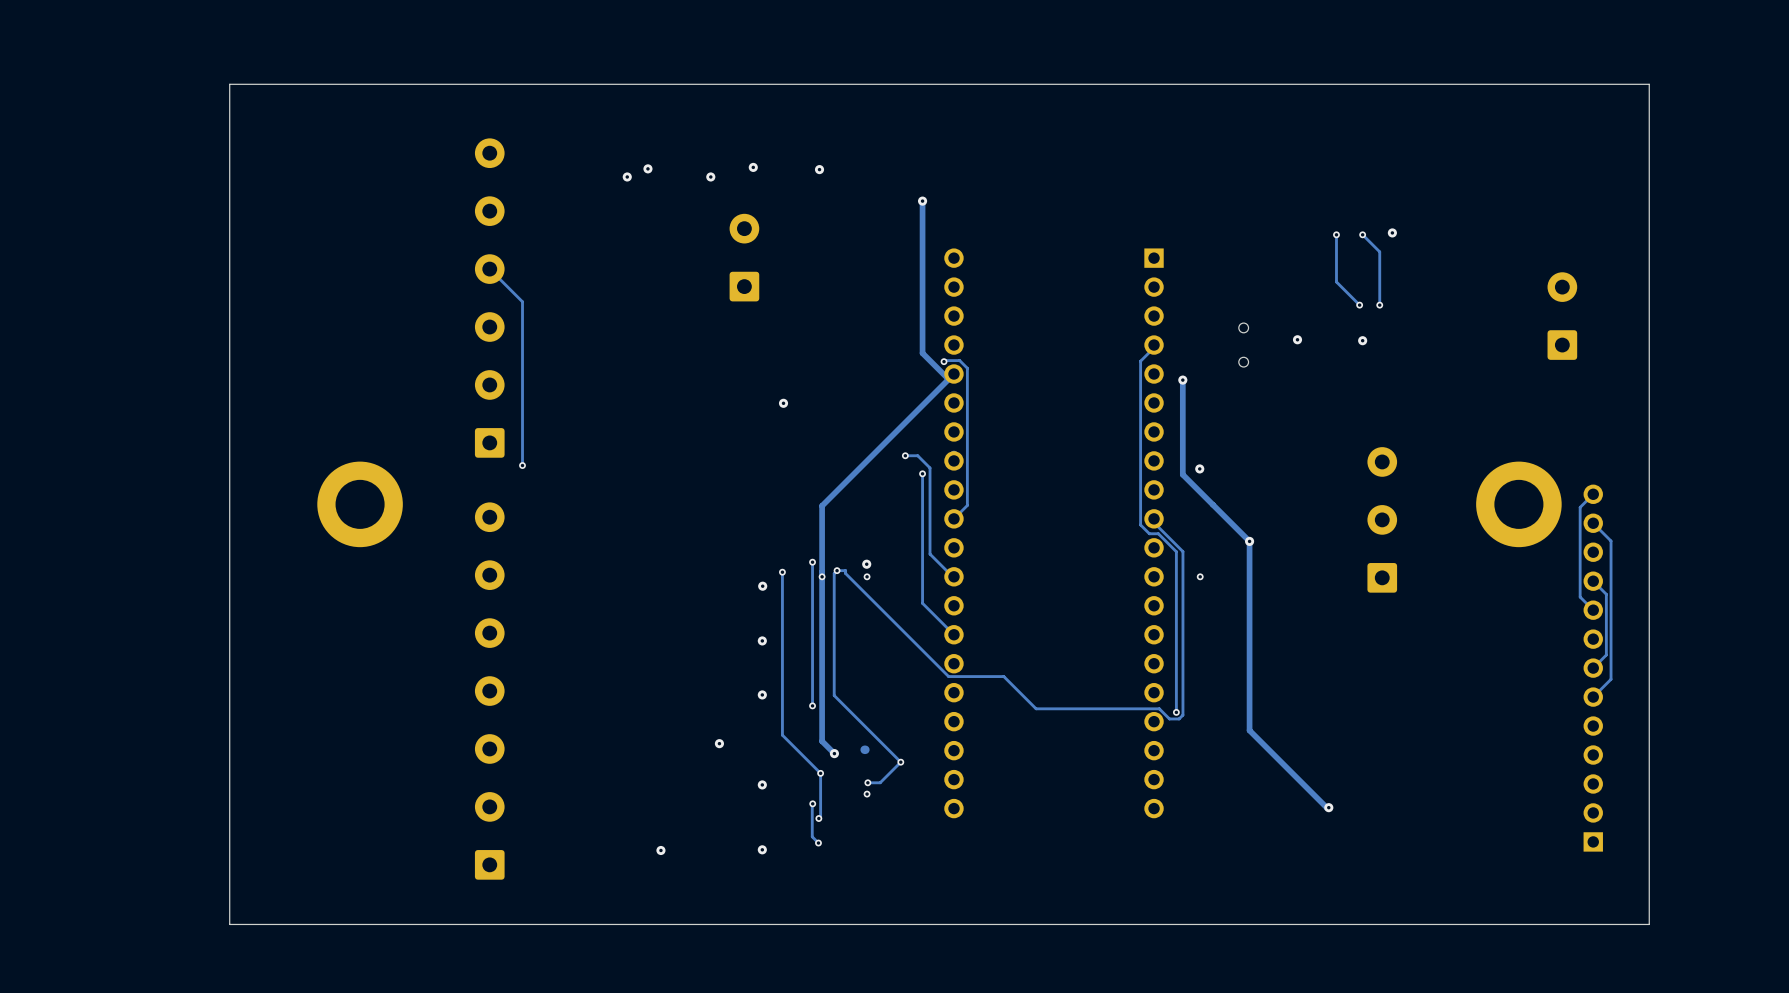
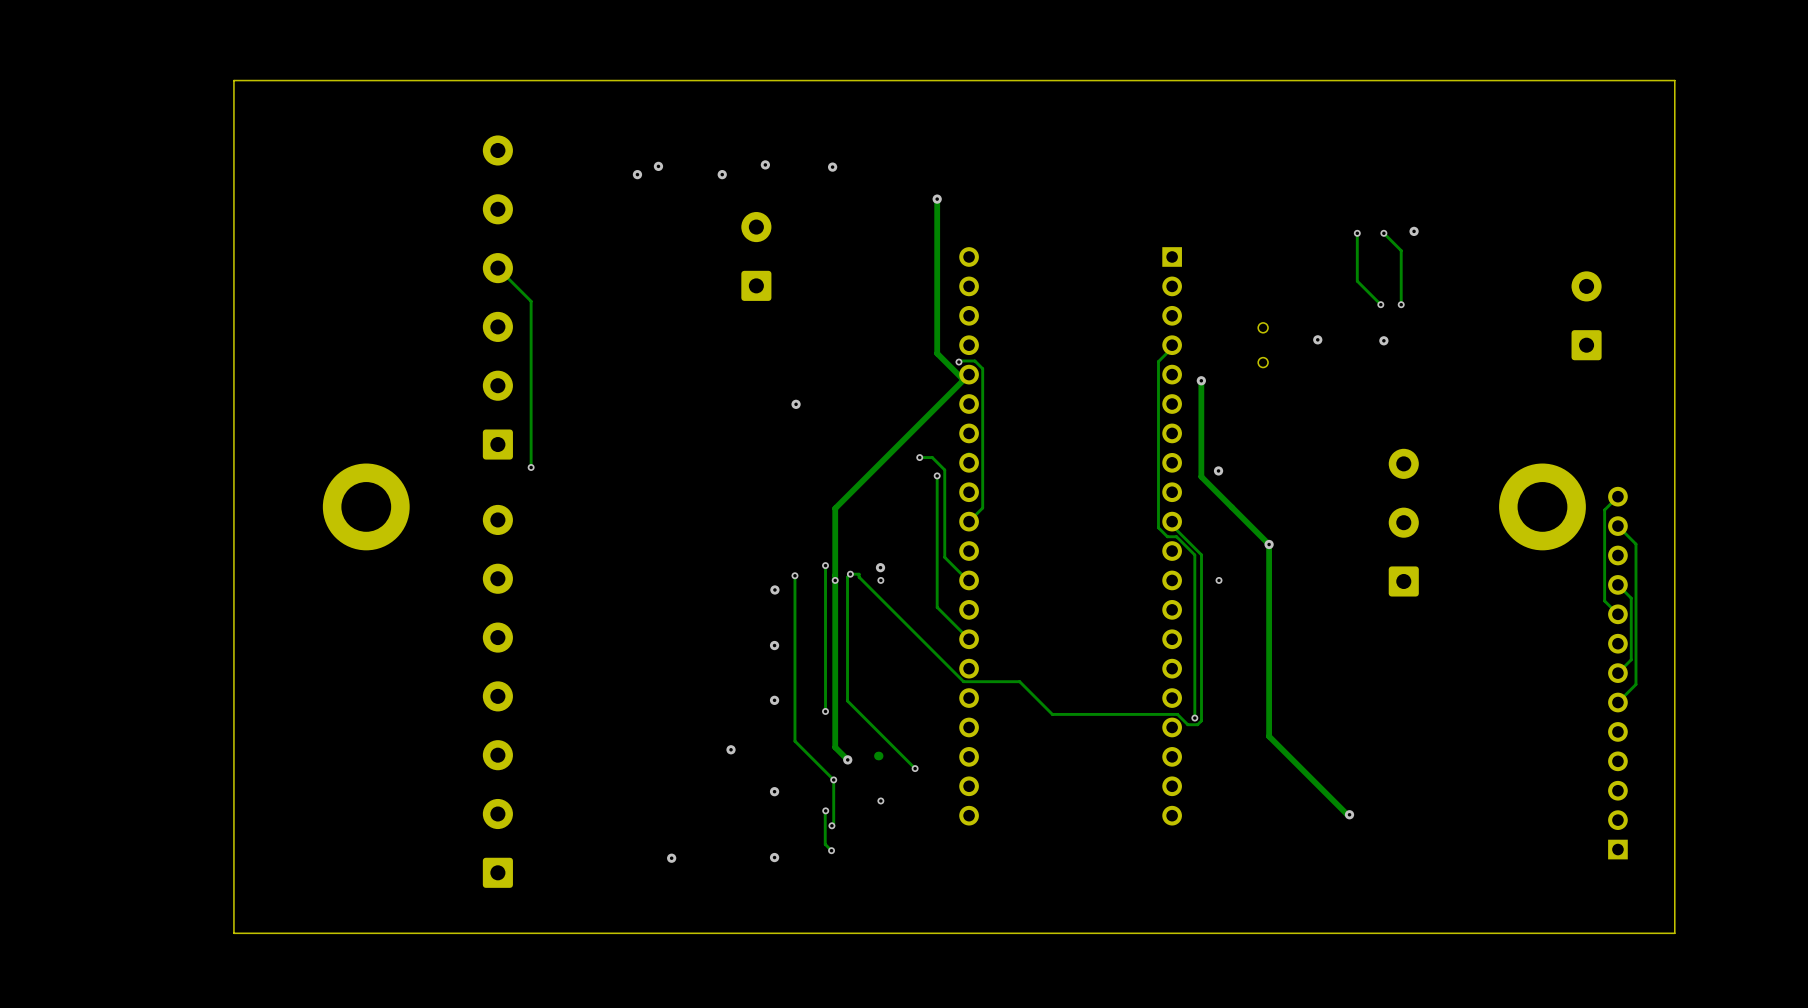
track: (900, 762) (880, 782) (867, 782) -> none
via: (867, 782) -> none

